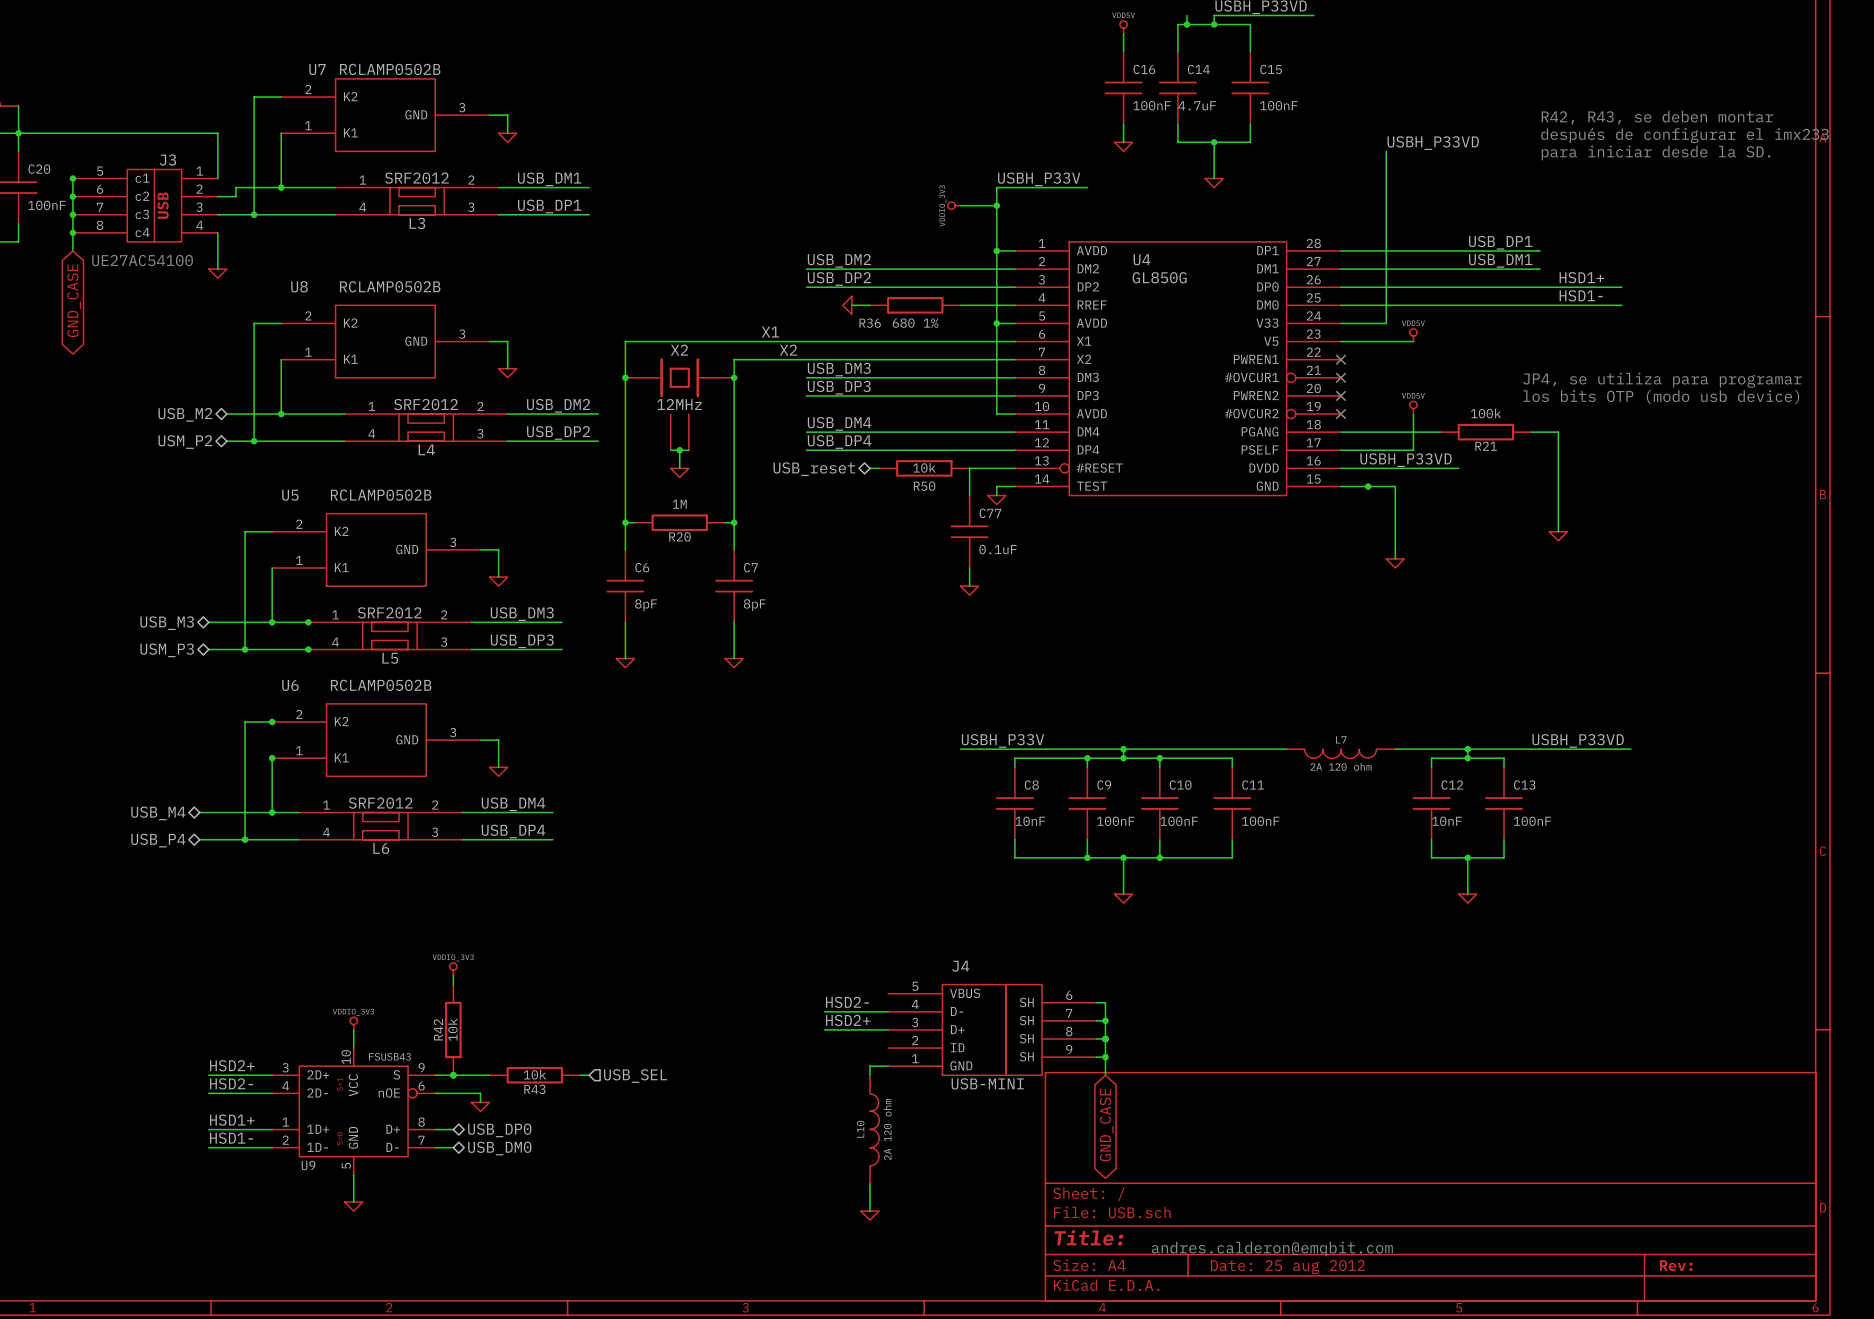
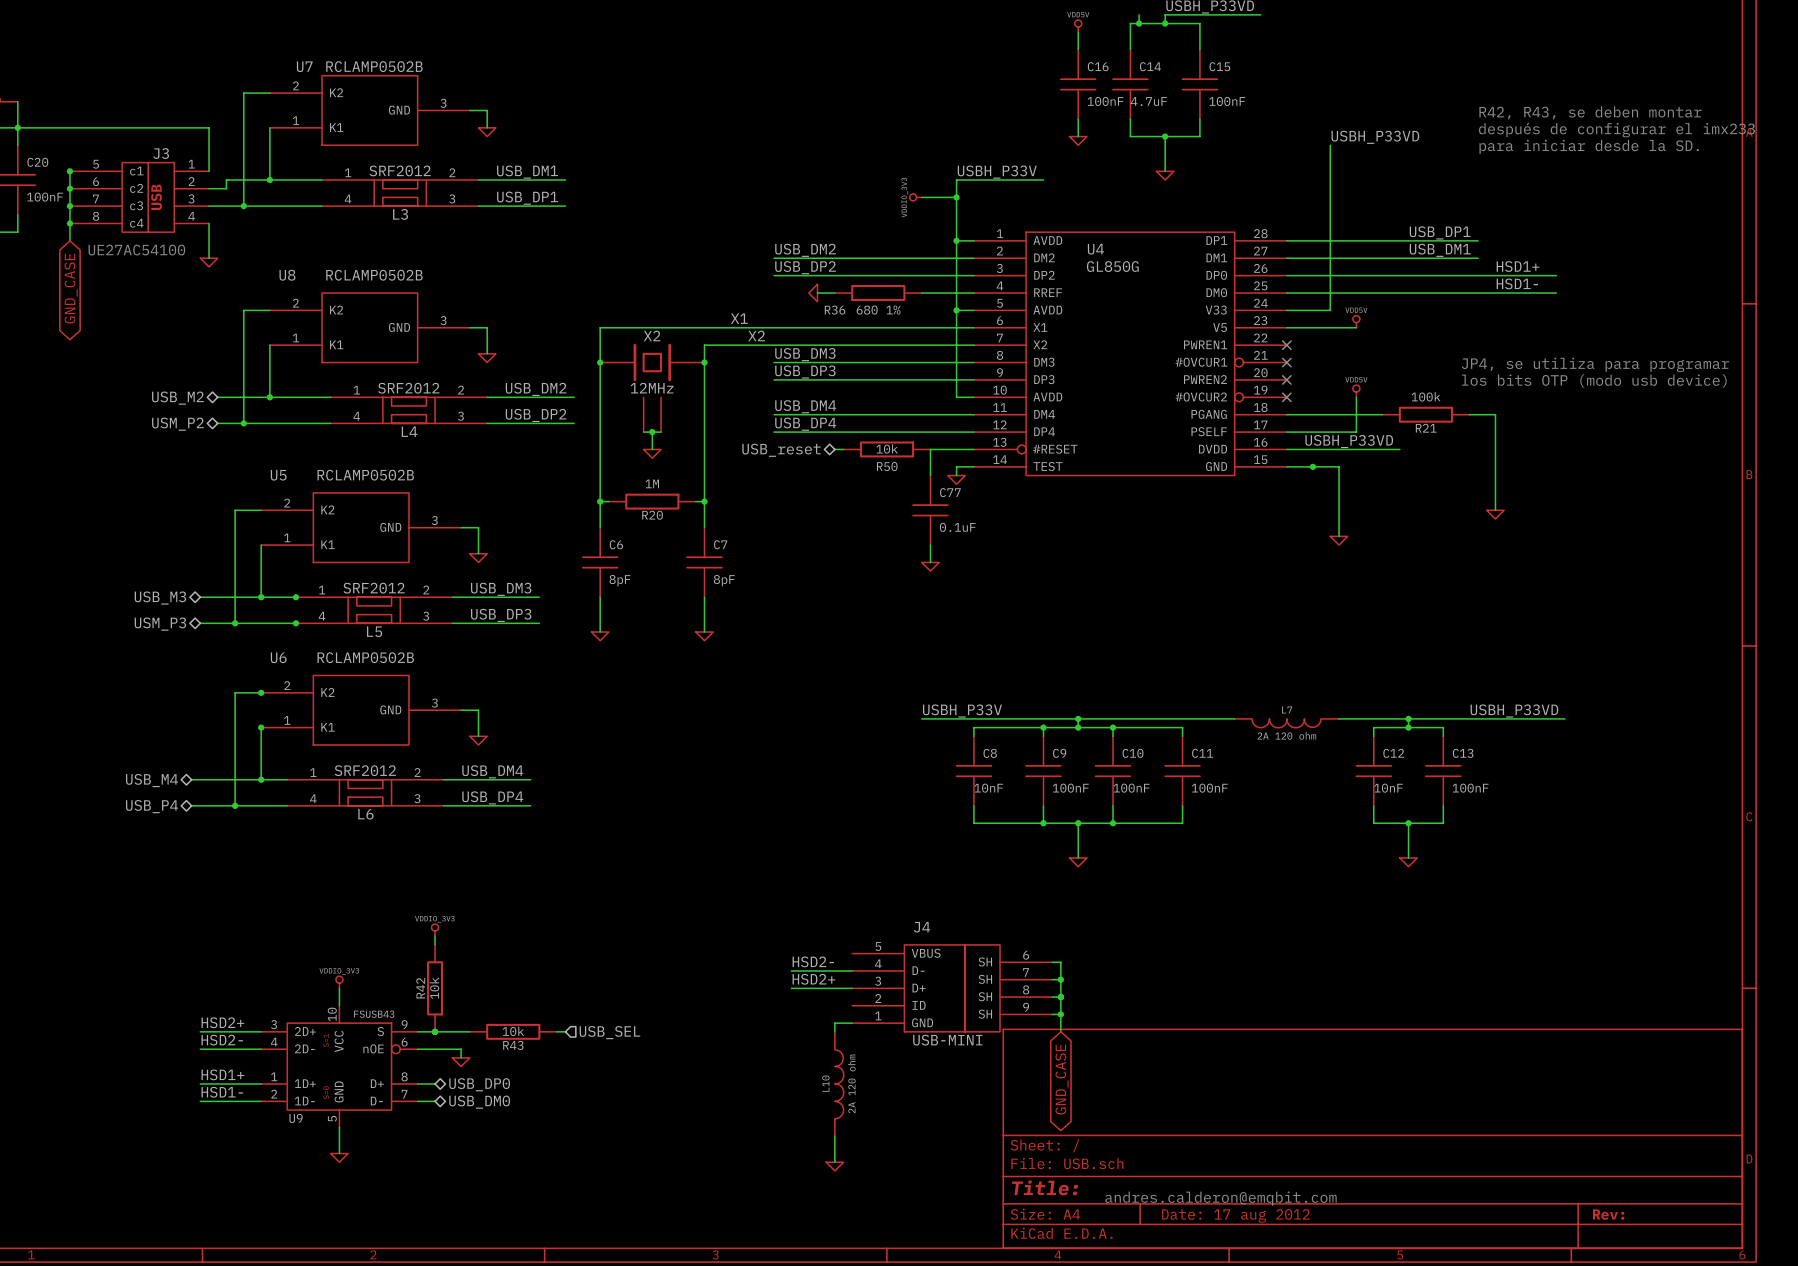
title block: Date: 25 aug 2012 (1287, 1267) -> Date: 17 aug 2012 (1235, 1215)

